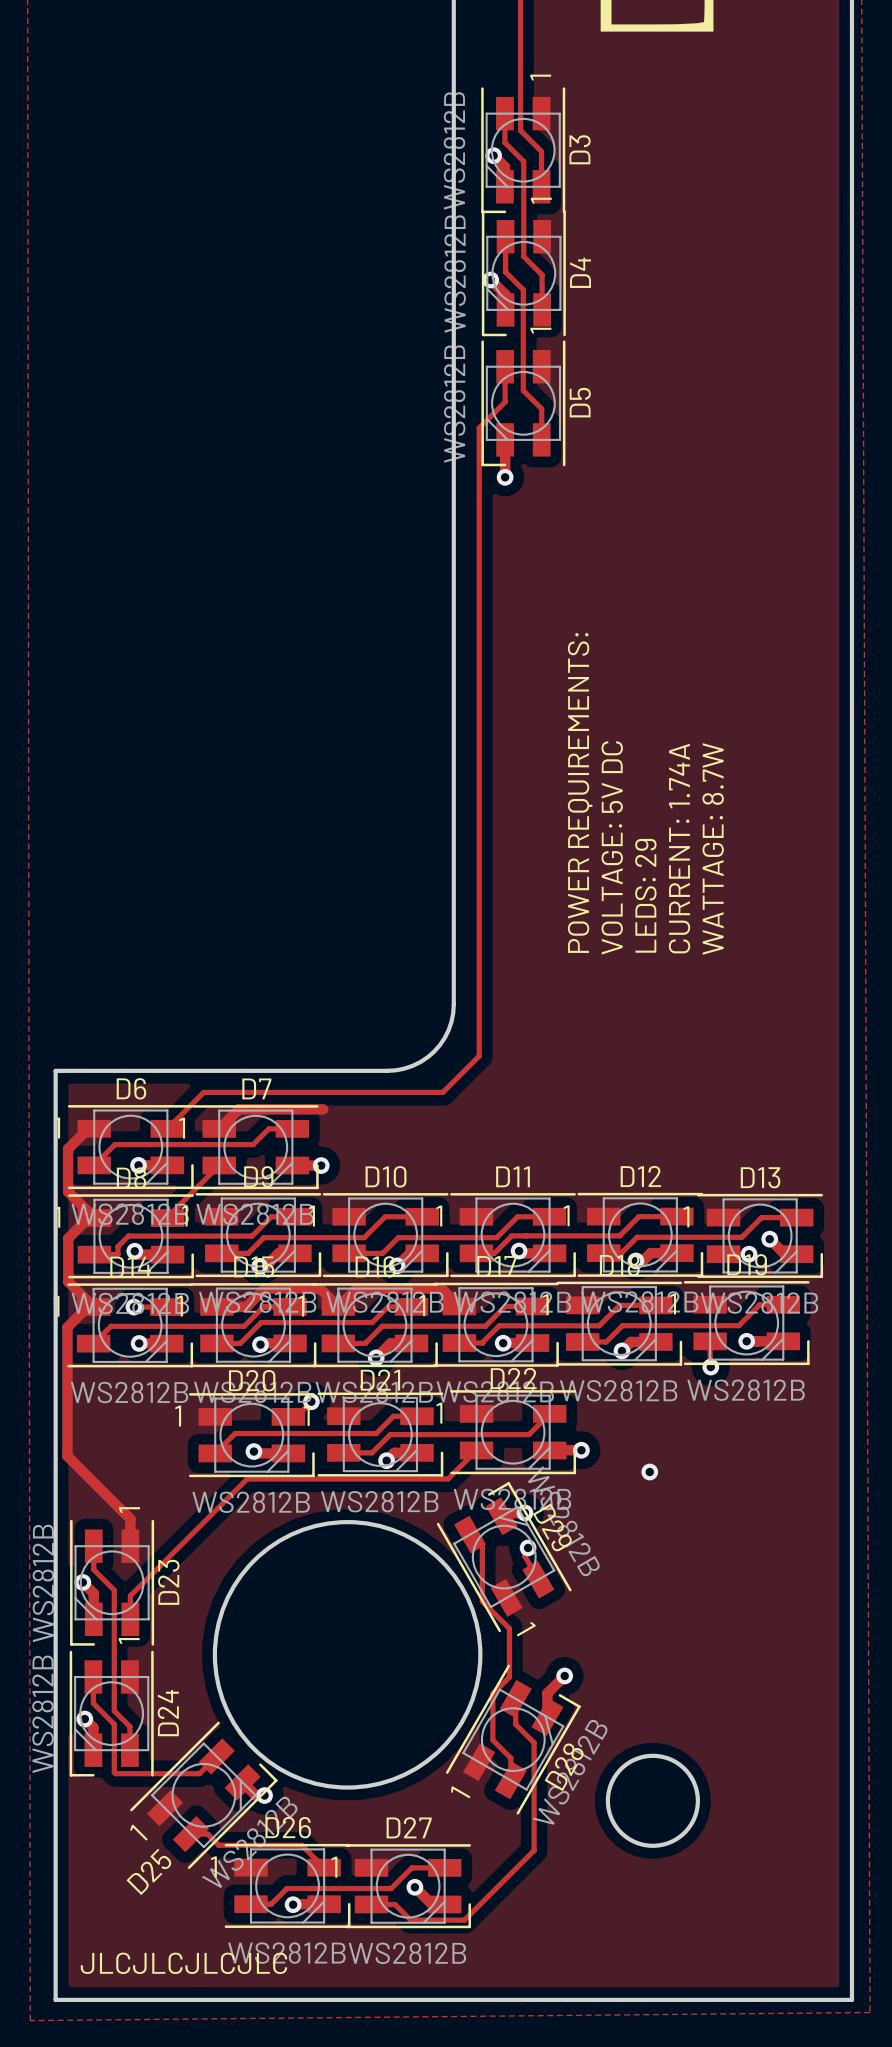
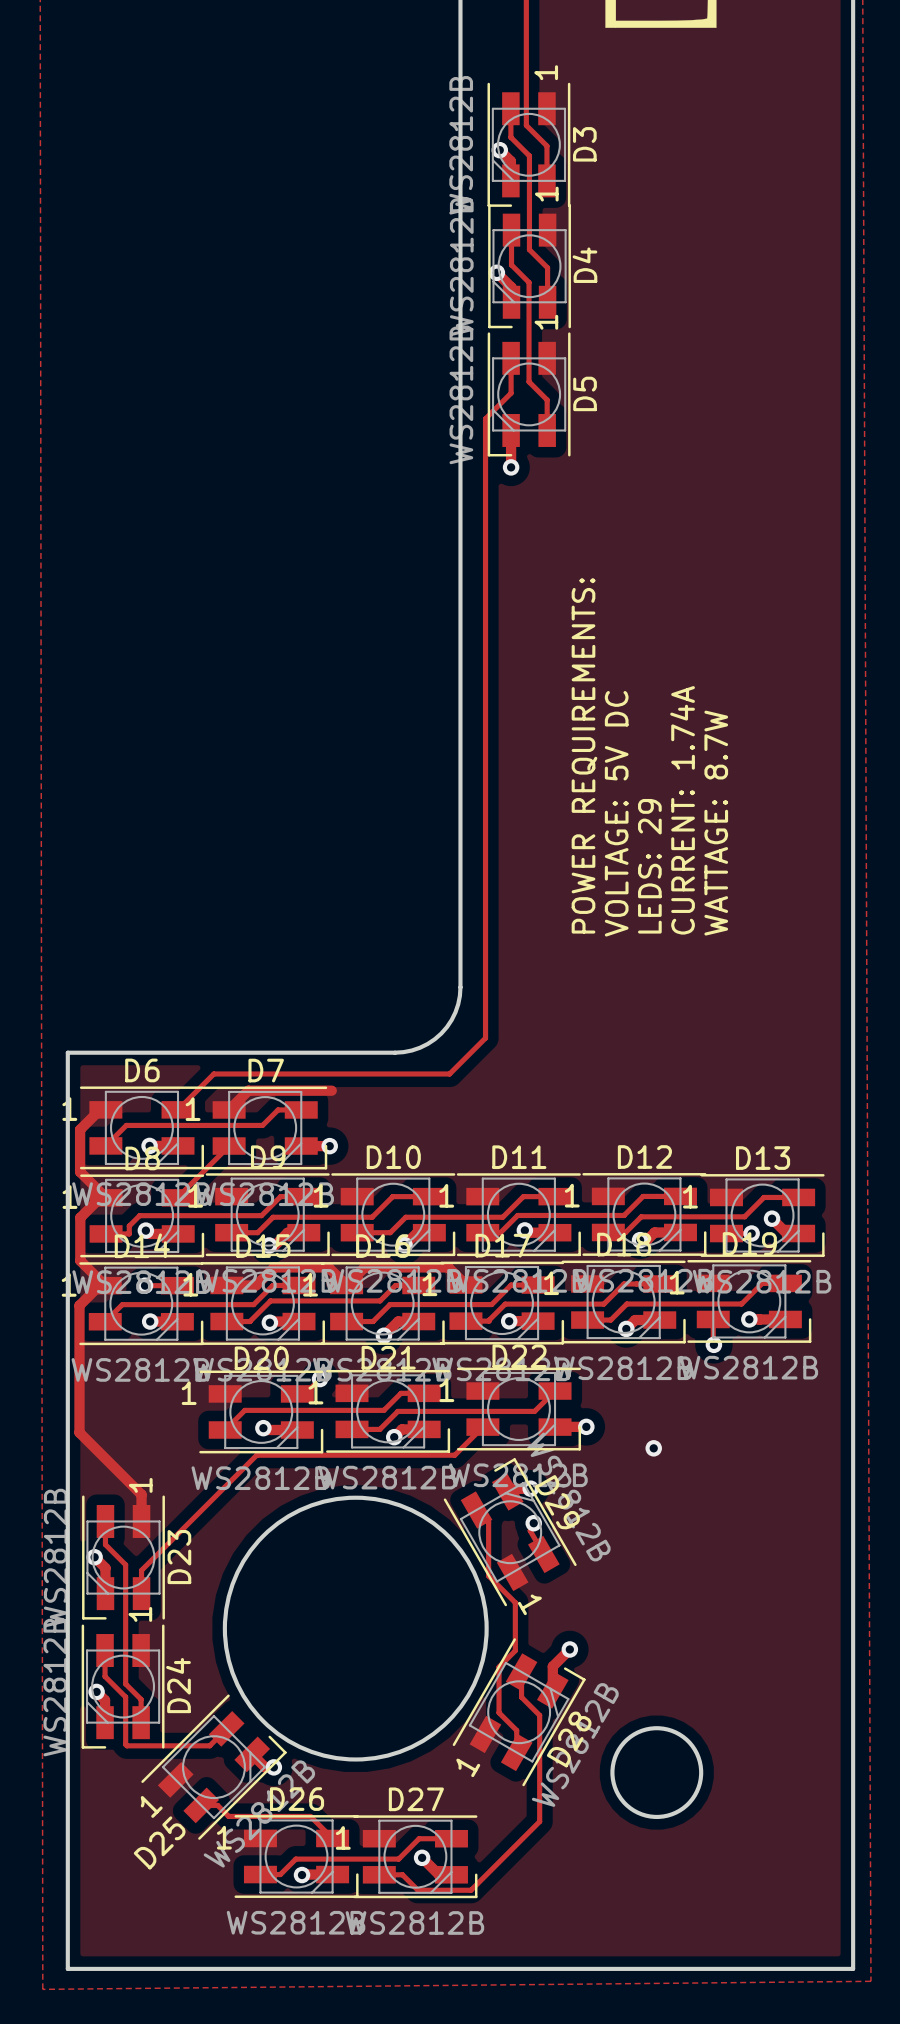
text: JLCJLCJLCJLC (183, 1963) -> none

